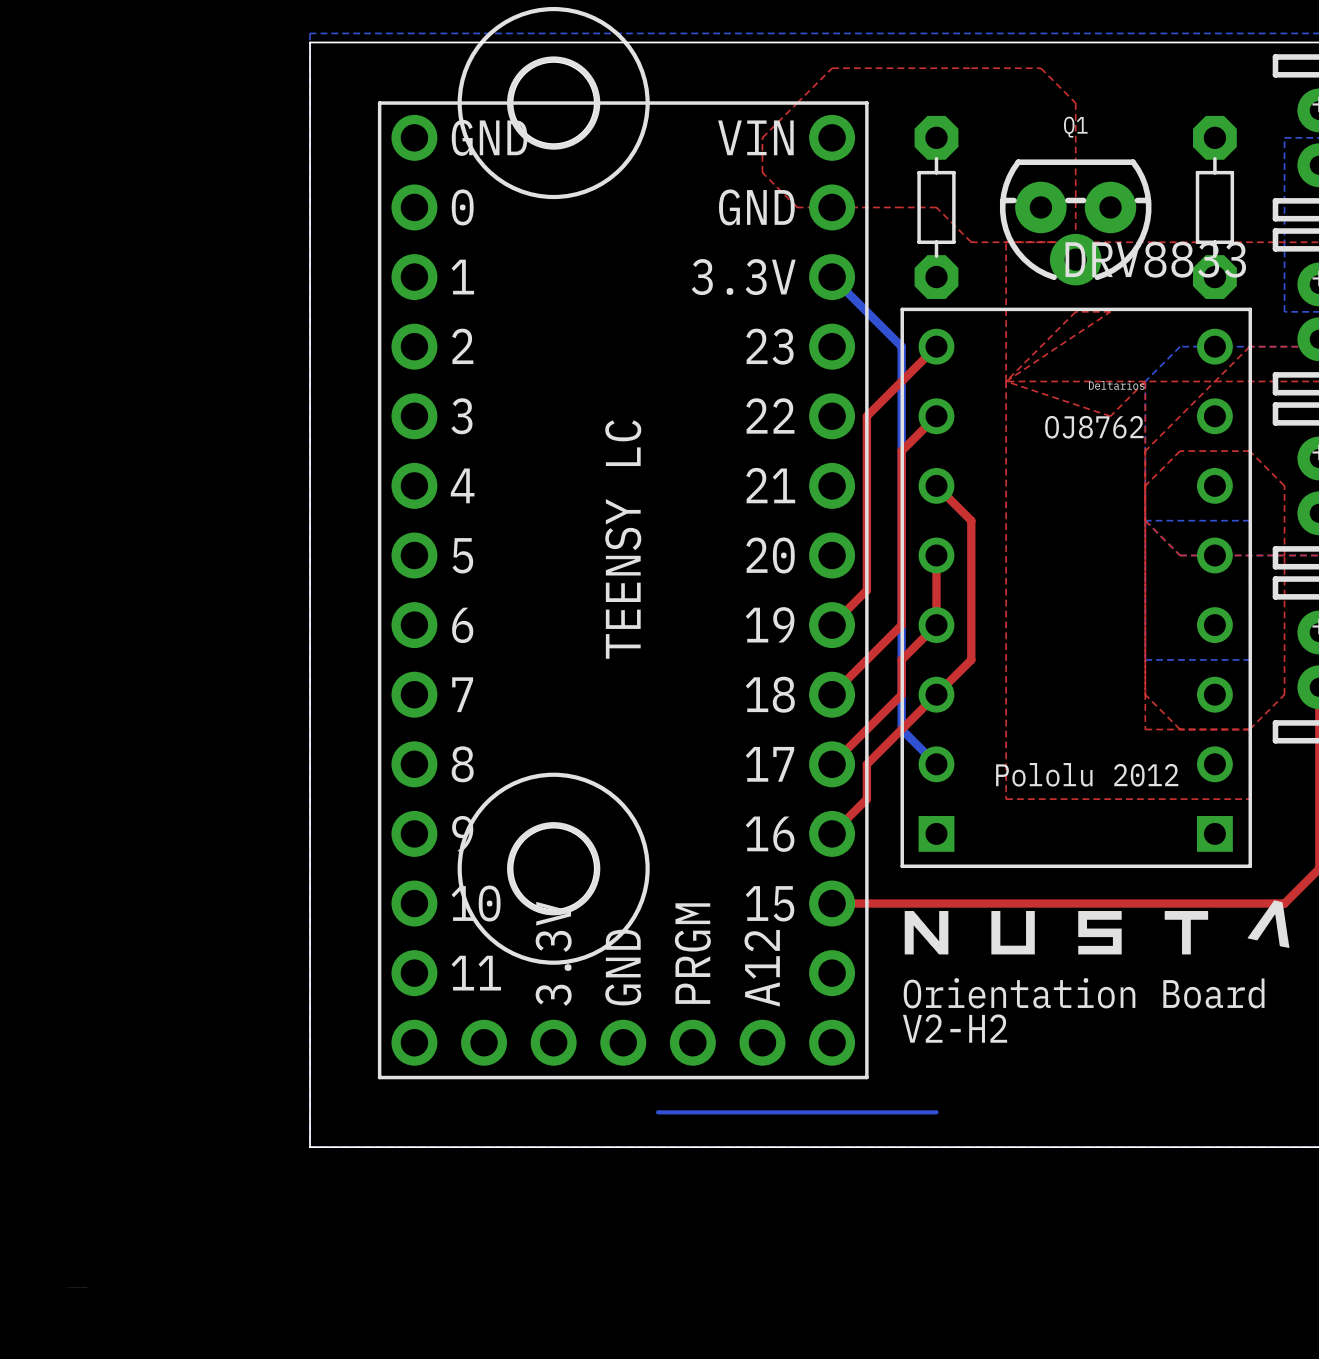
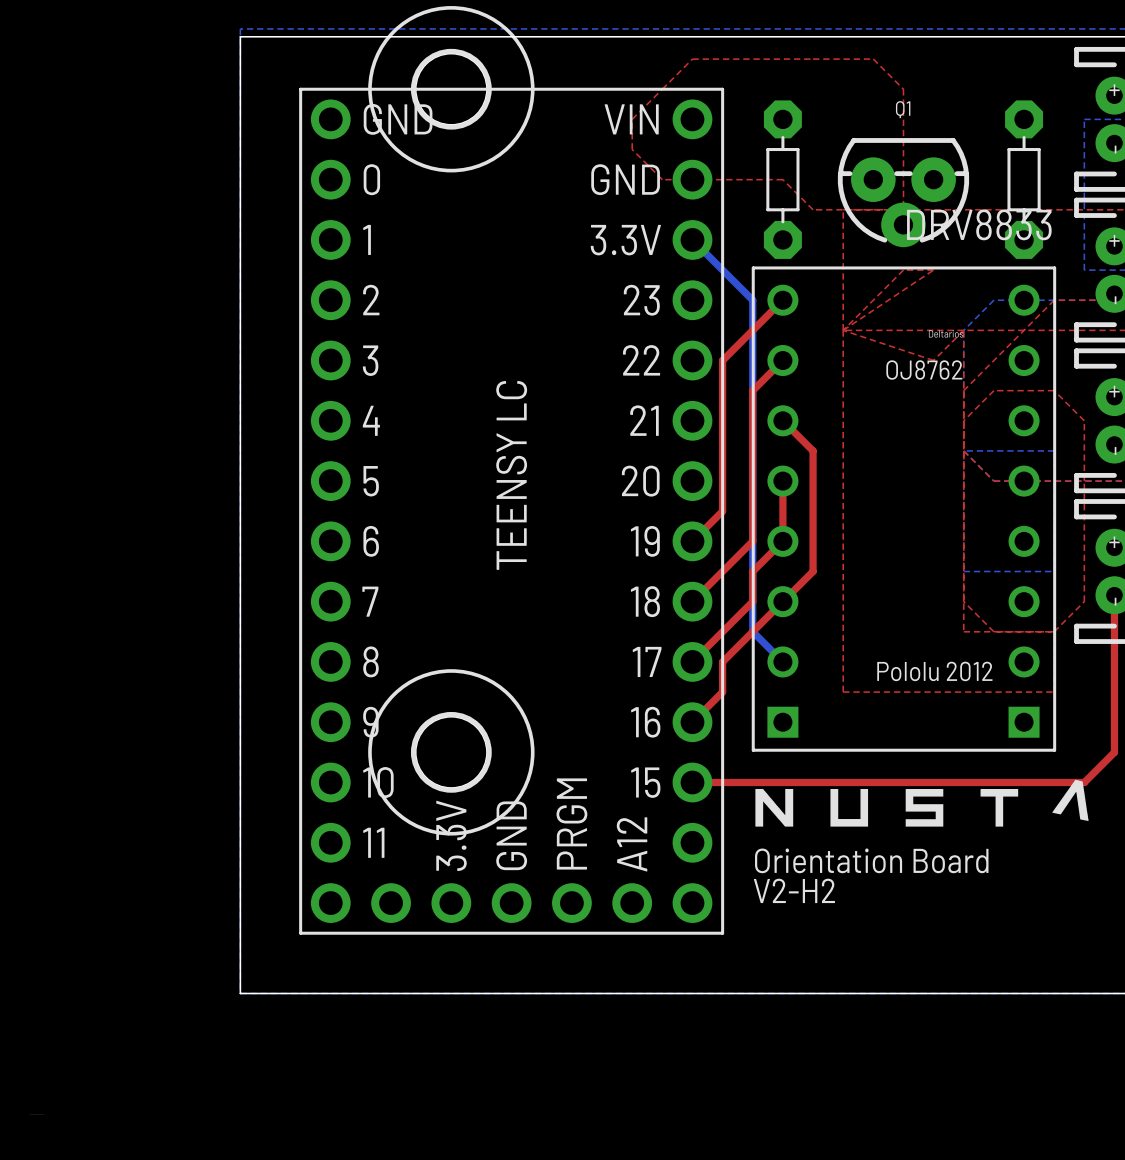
bottom track: (658, 1112) (936, 1112) -> none

